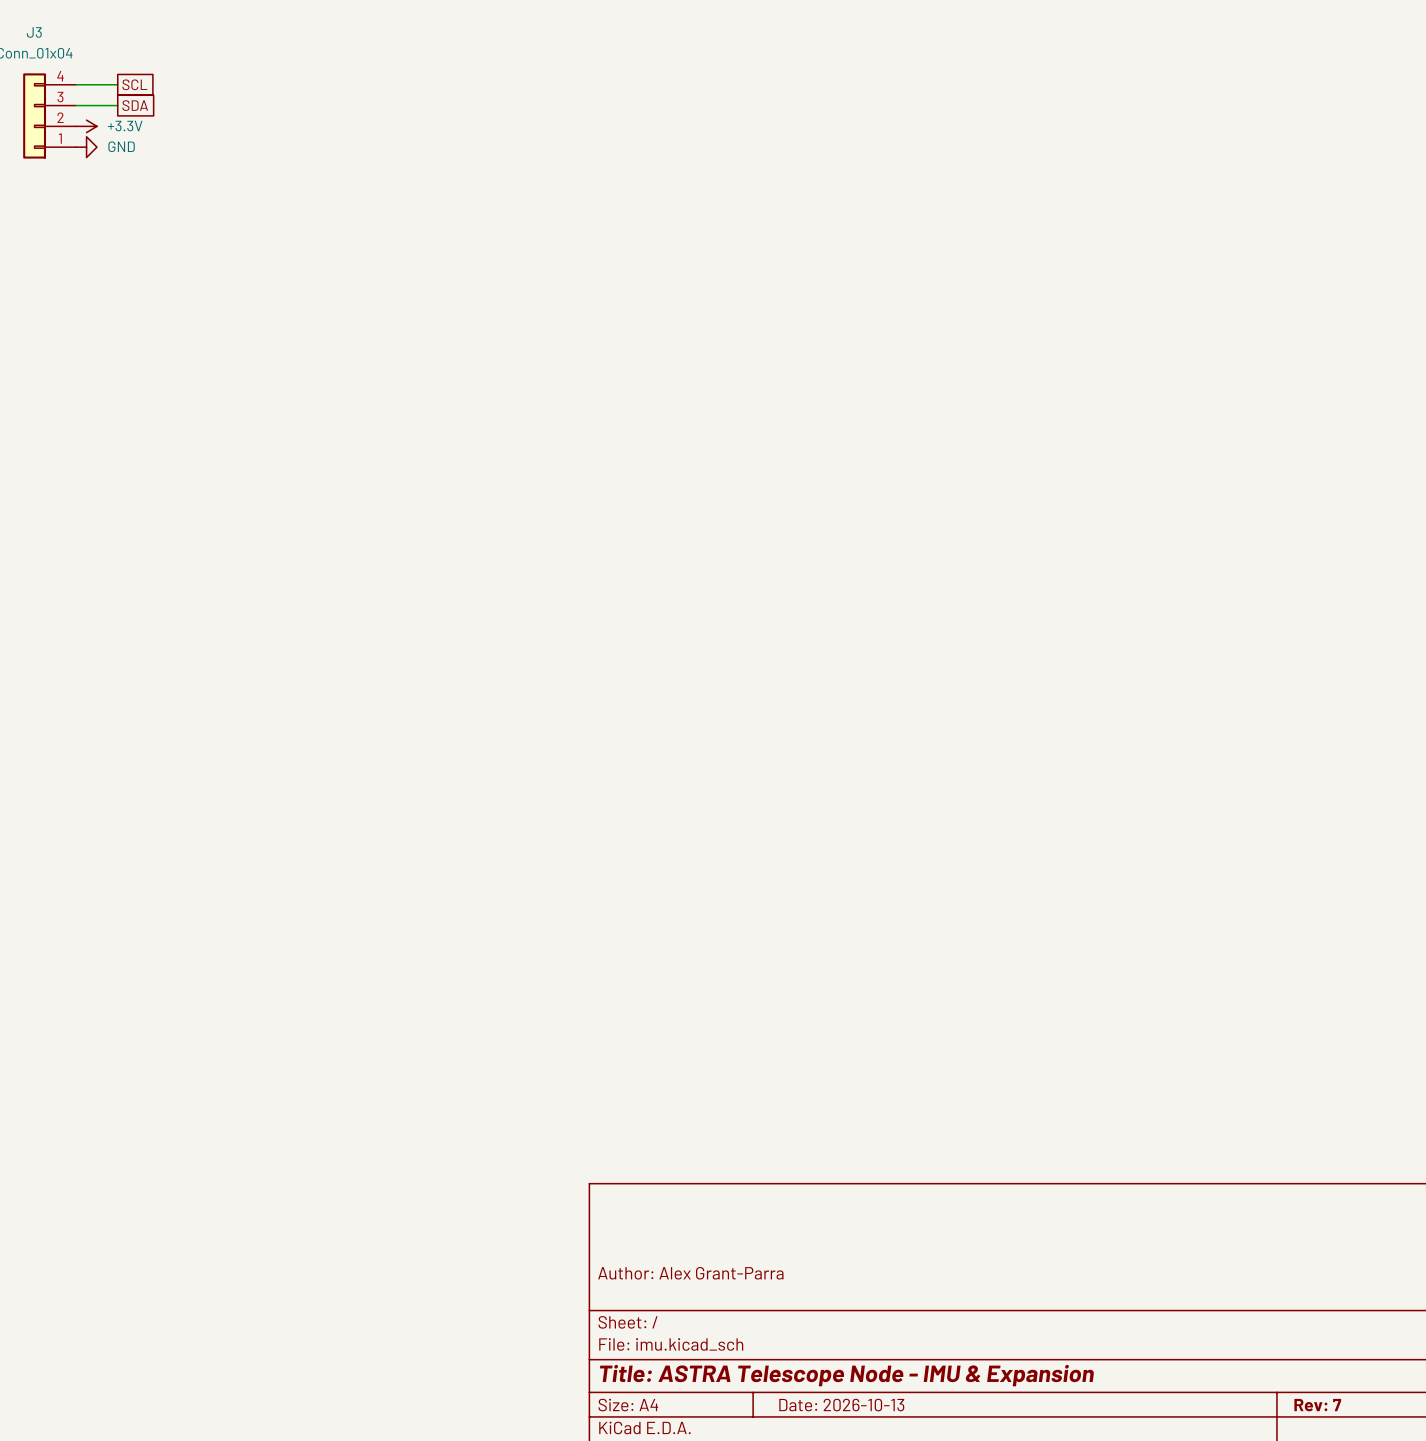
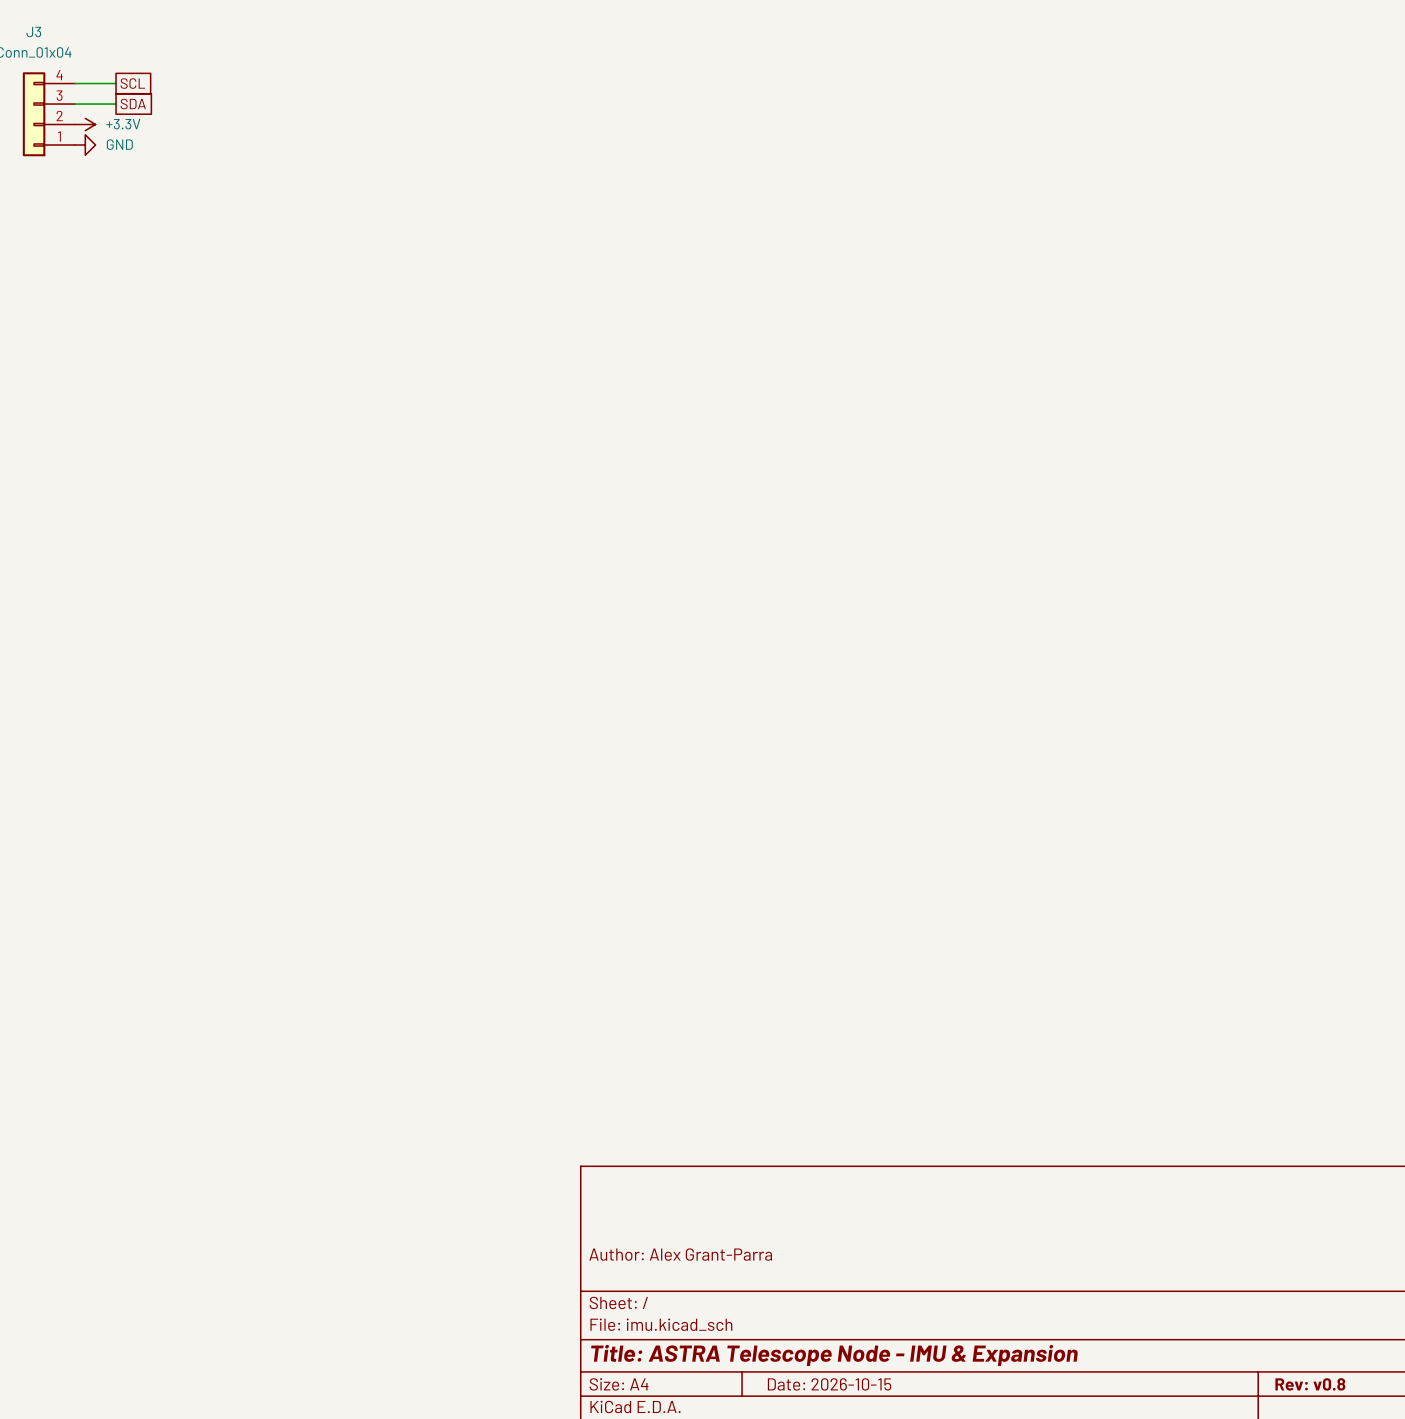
title block: Date: 2026-10-13 (841, 1405) -> Date: 2026-10-15 (829, 1384)
title block: Rev: 7 (1317, 1405) -> Rev: v0.8 (1310, 1384)

